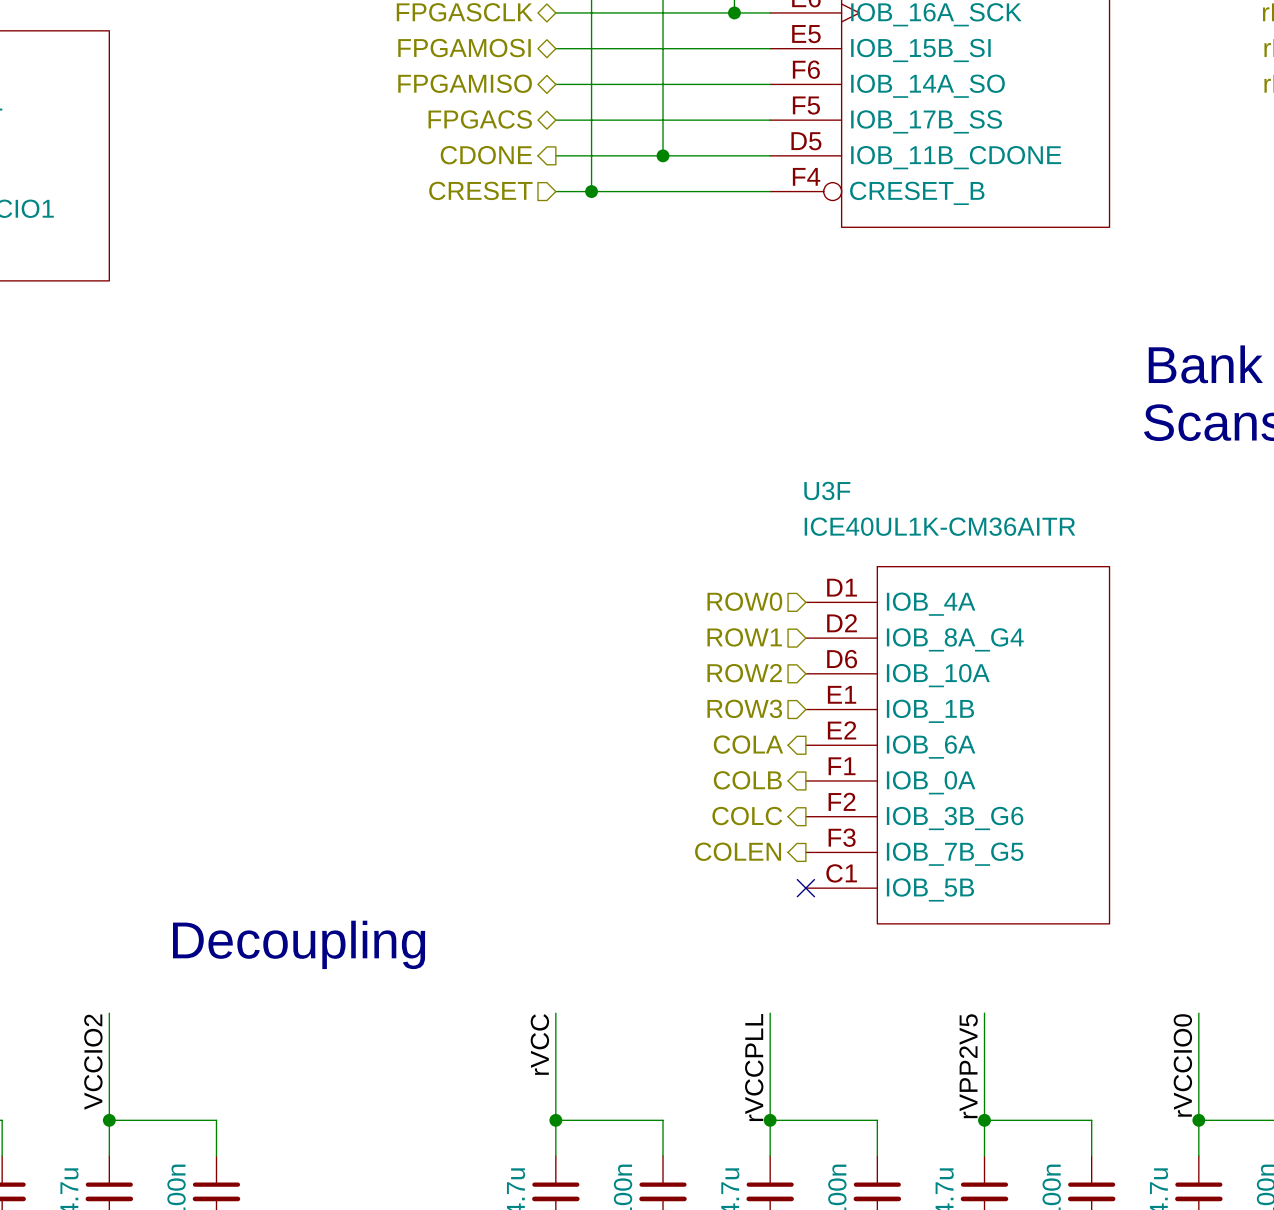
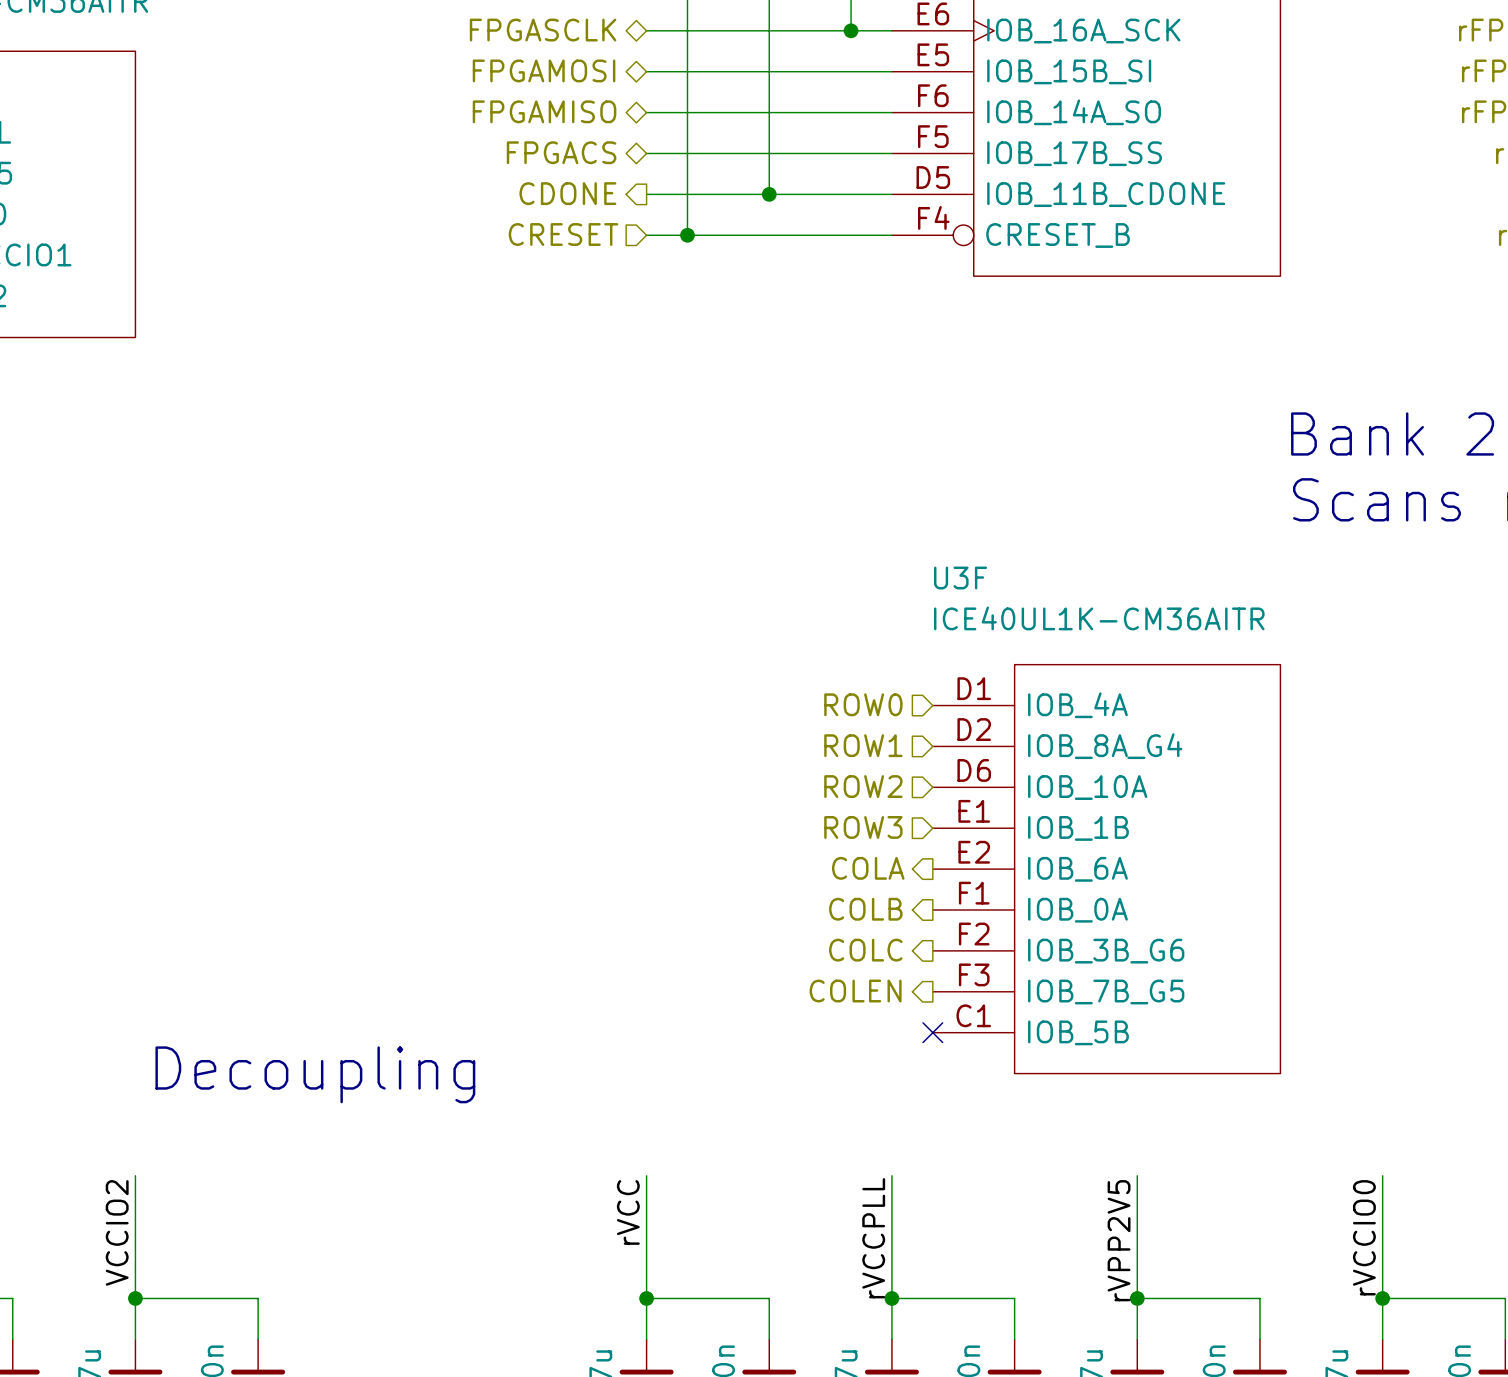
text position: Decoupling (299, 944) -> Decoupling (315, 1074)

